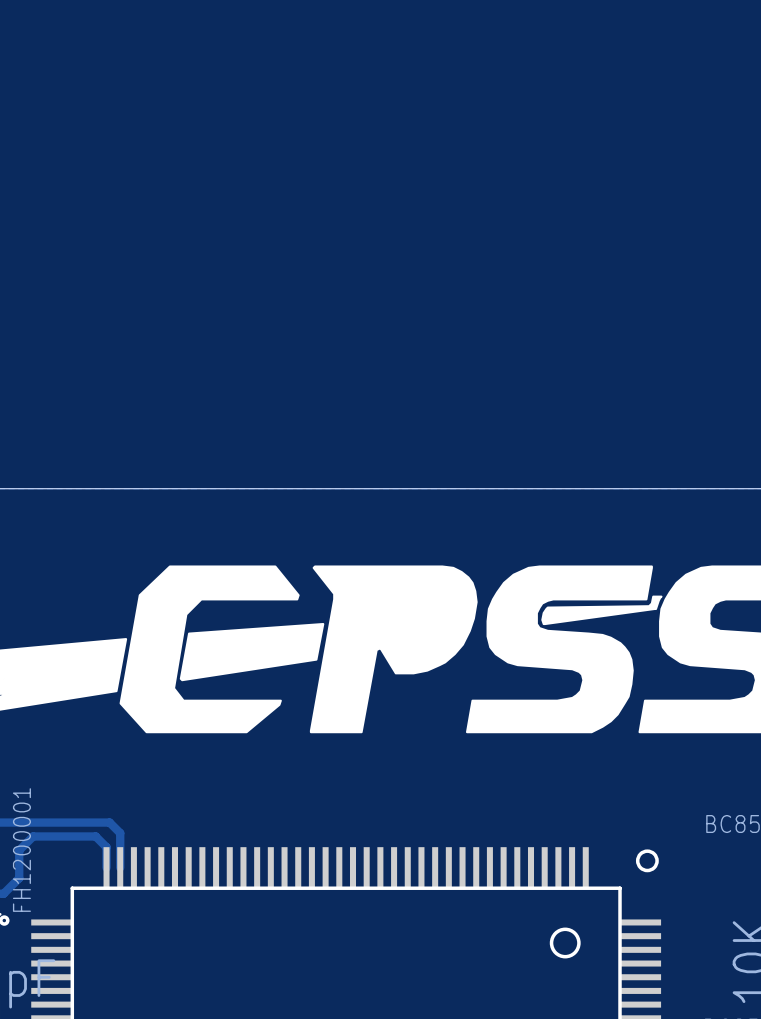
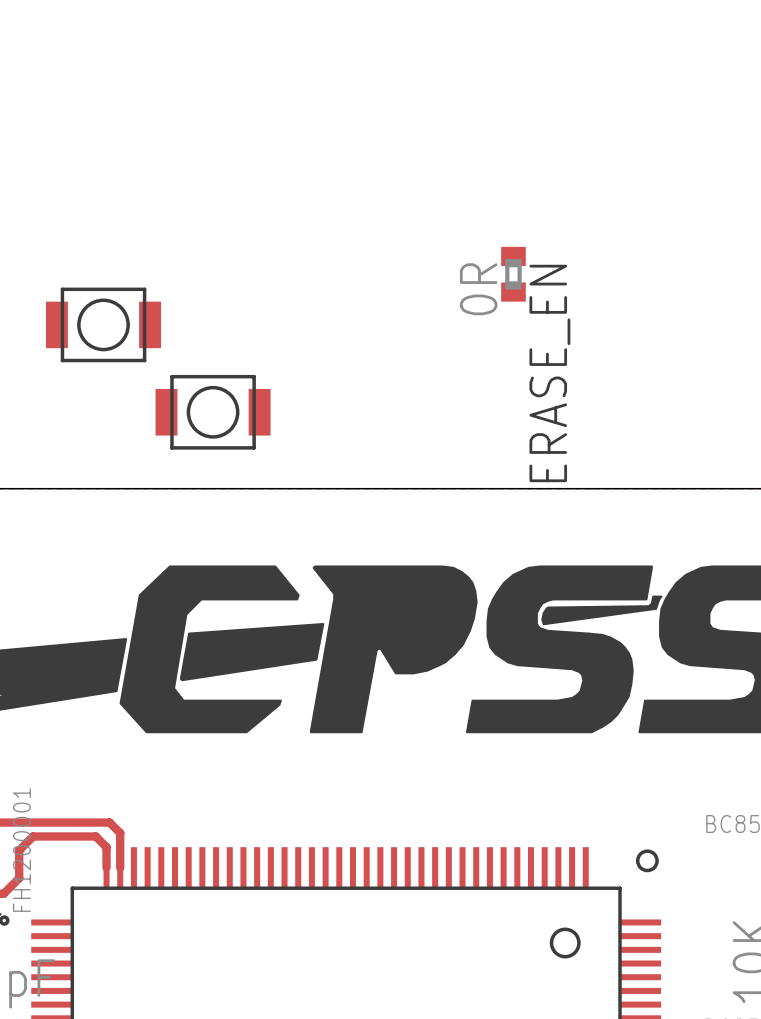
ERASE_EN: none -> 0R (513, 274)
part: none -> (103, 324)
part: none -> (213, 412)

